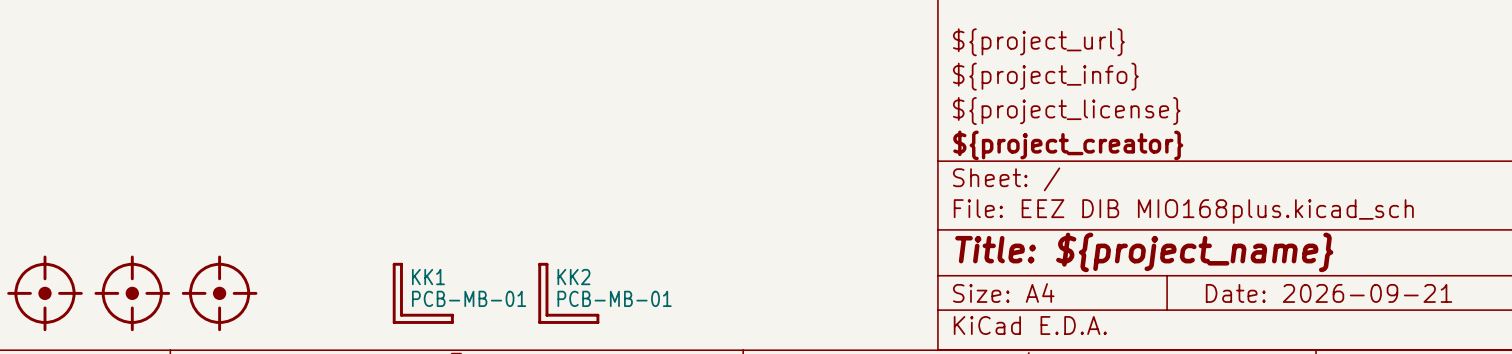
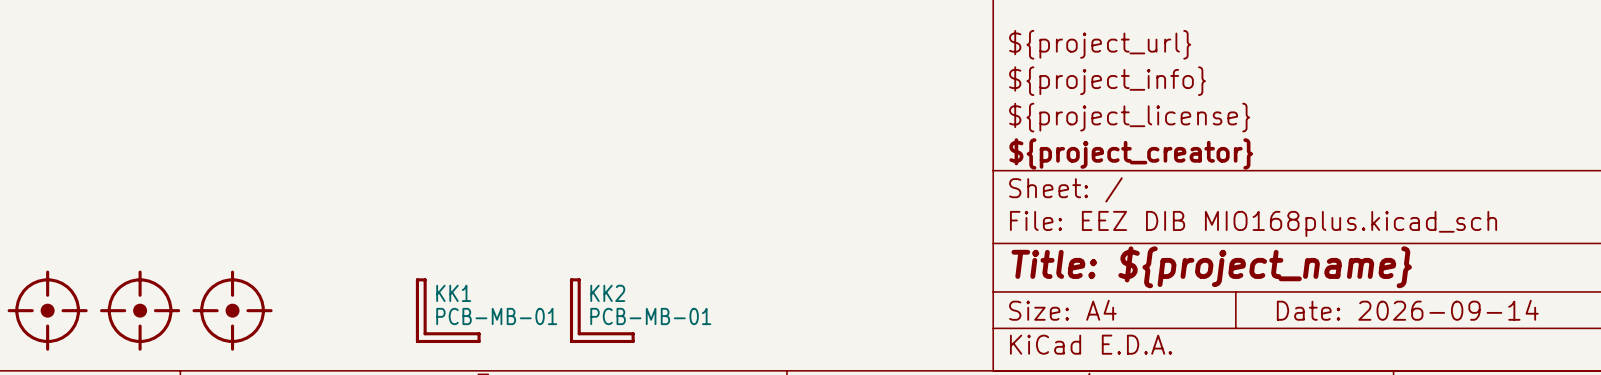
title block: Date: 2026-09-21 (1329, 293) -> Date: 2026-09-14 (1407, 310)

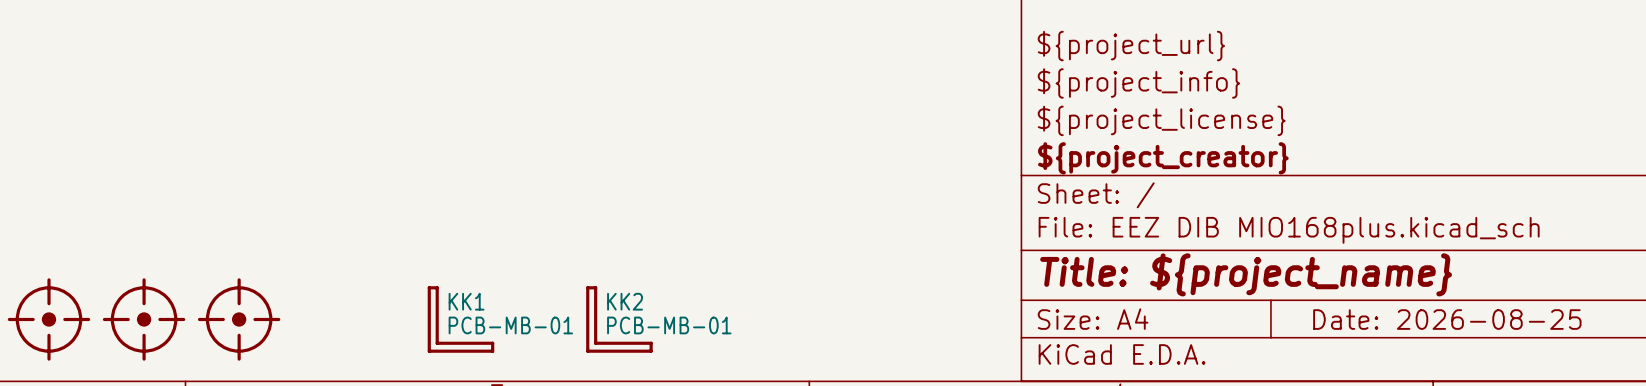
title block: Date: 2026-09-14 (1407, 310) -> Date: 2026-08-25 (1447, 319)

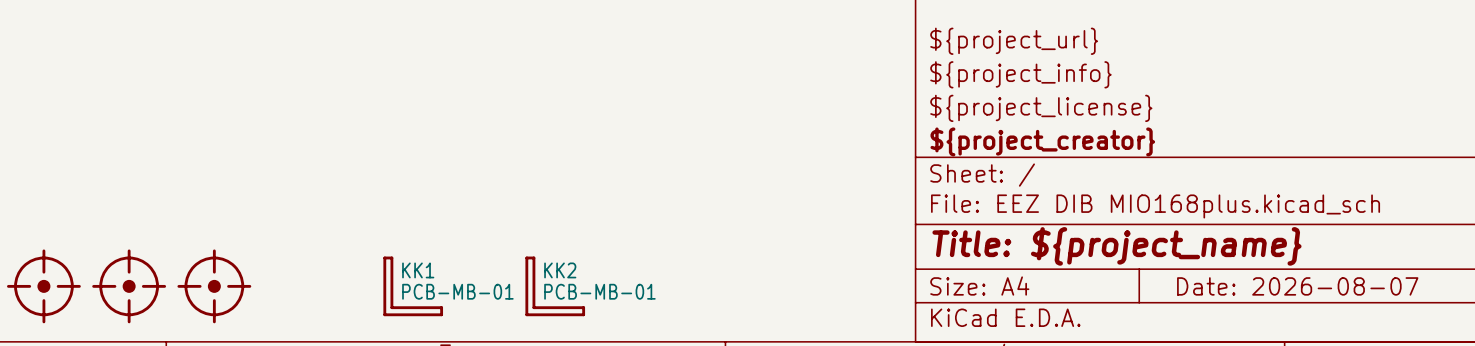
title block: Date: 2026-08-25 (1447, 319) -> Date: 2026-08-07 (1297, 286)

